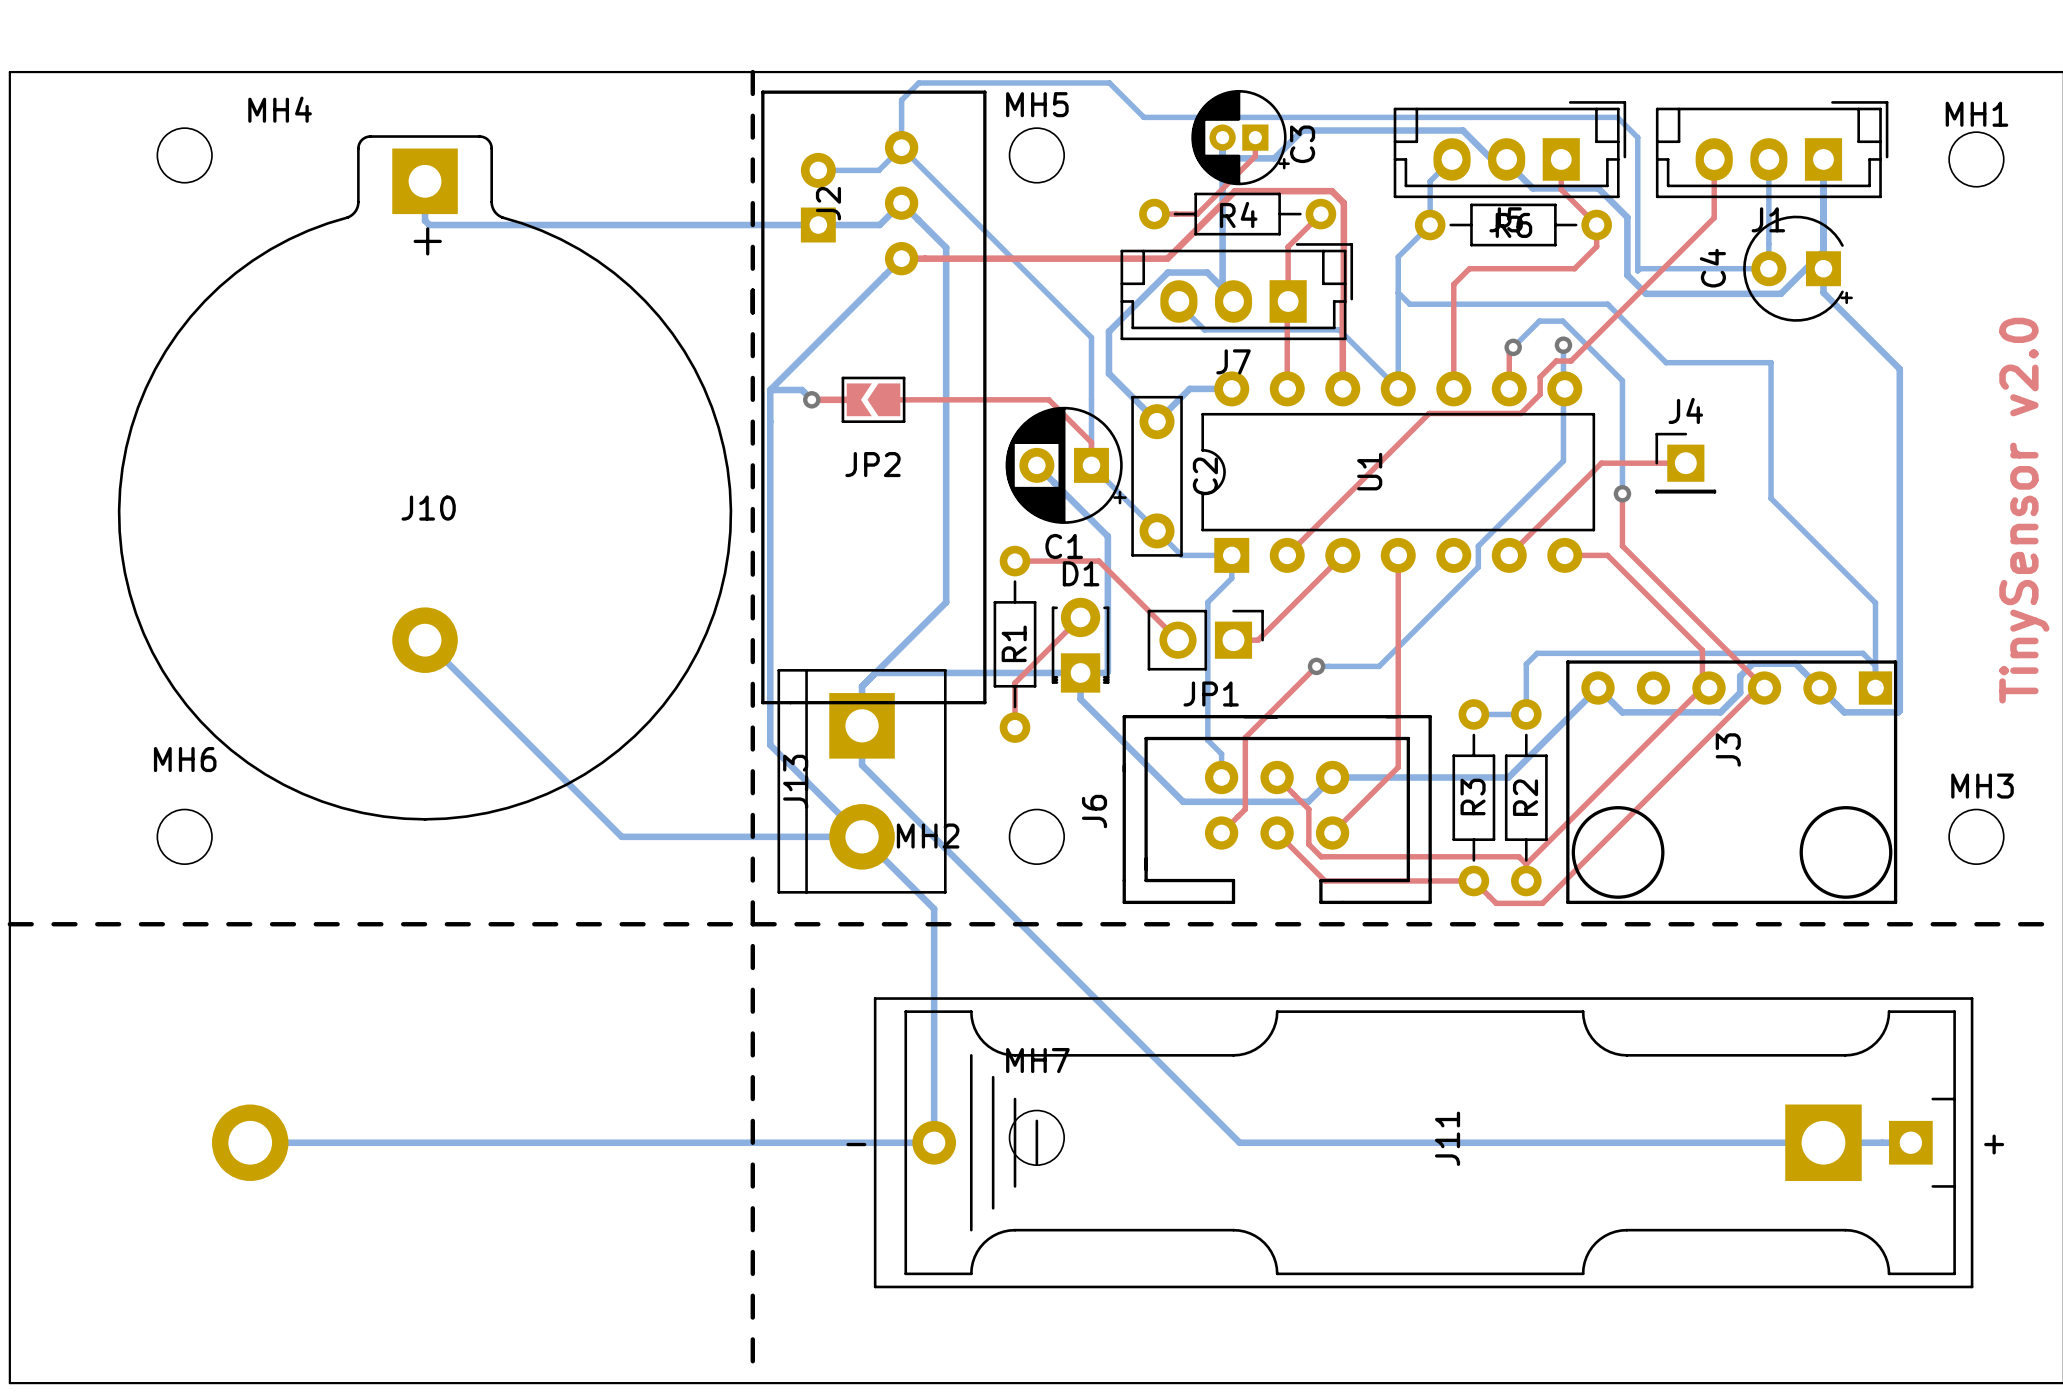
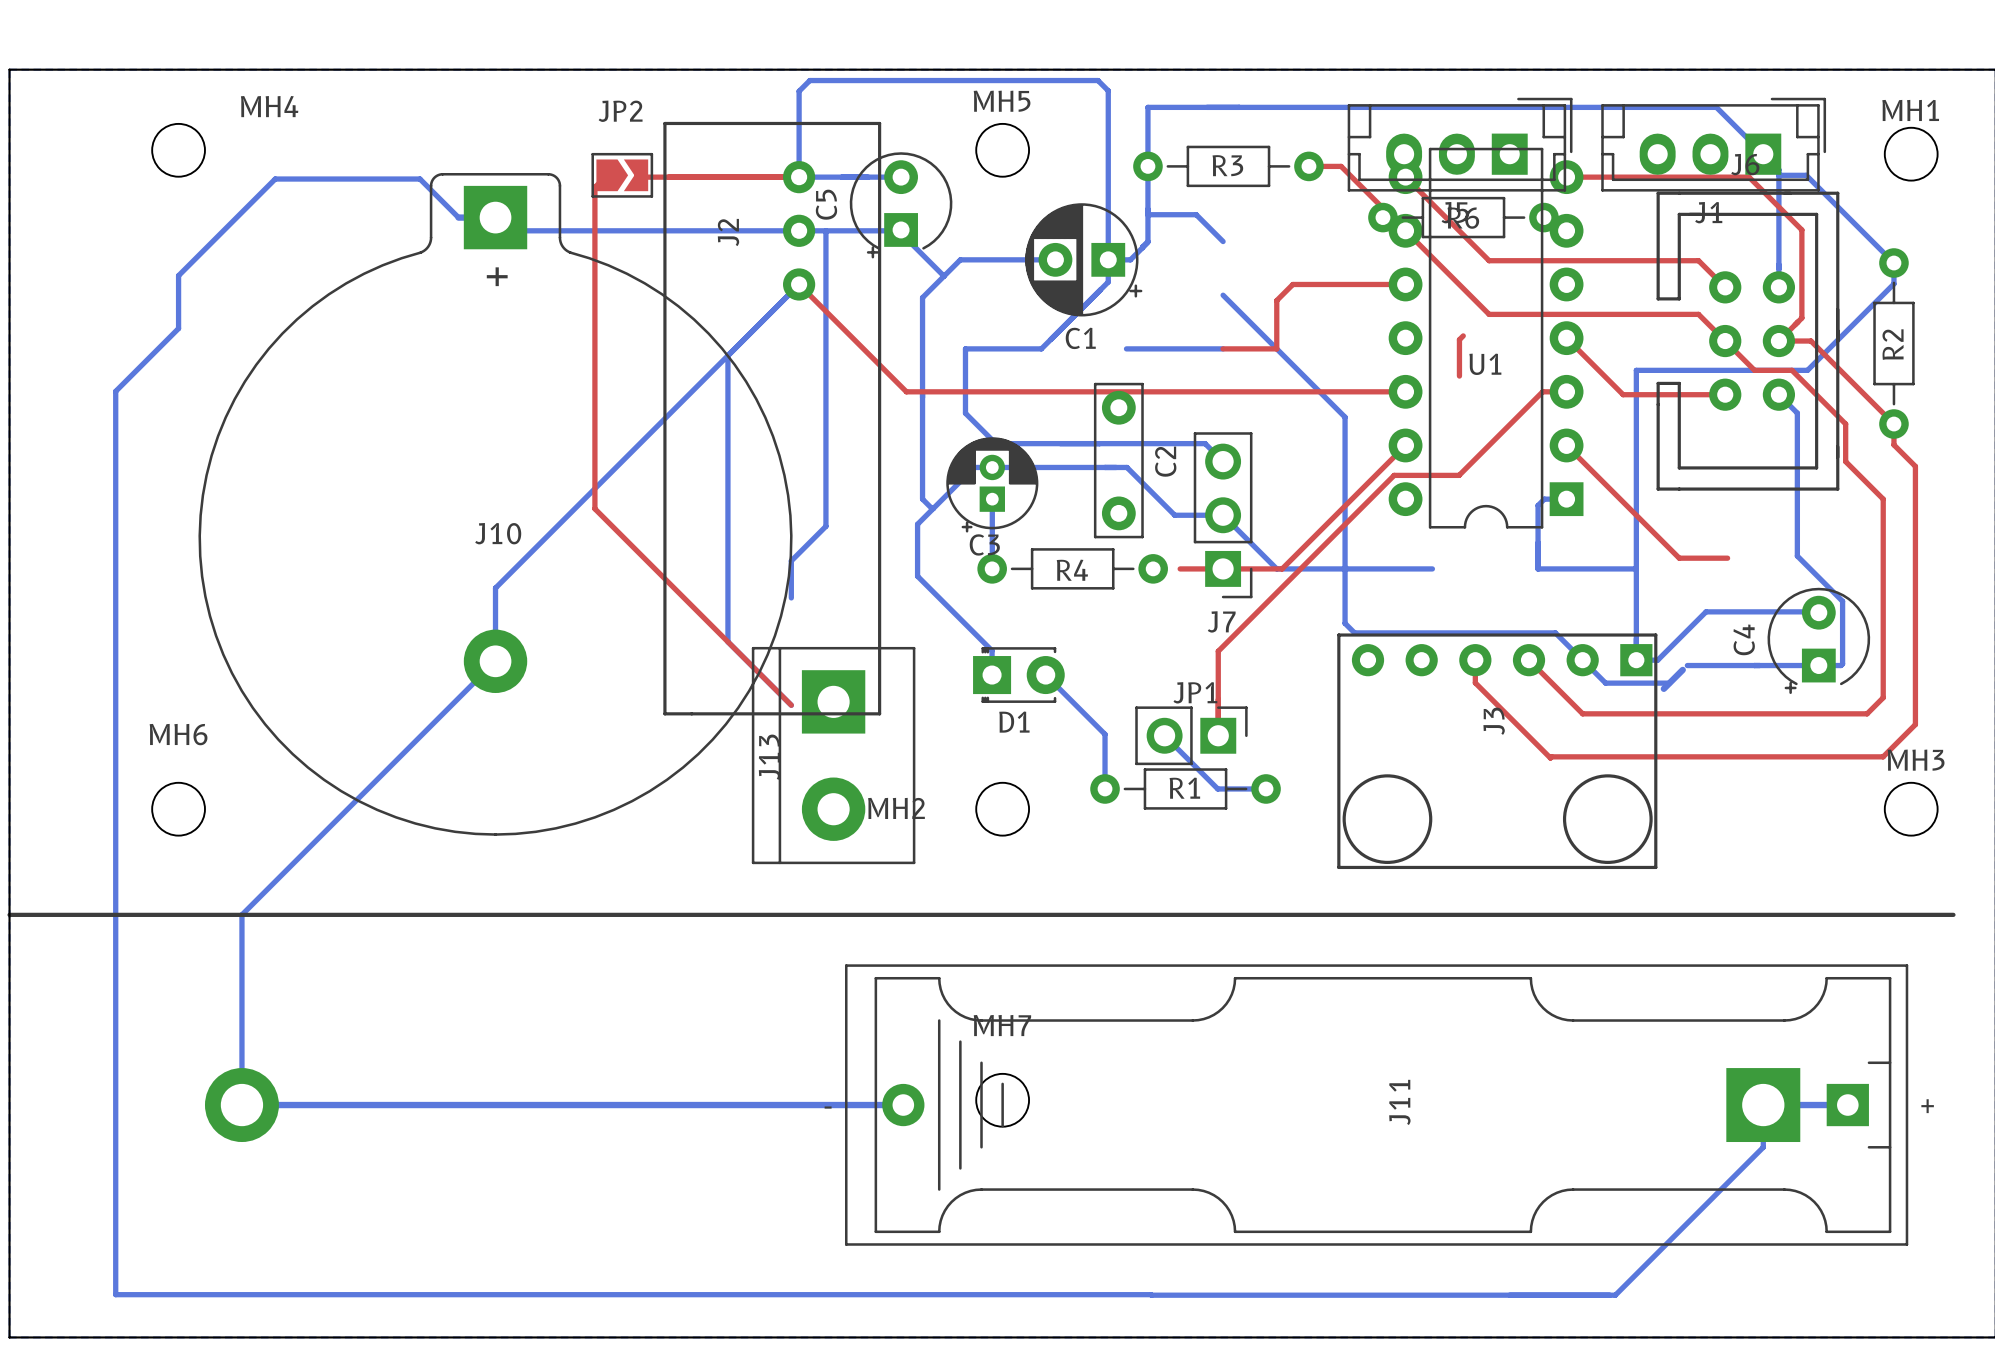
line: (752, 72) (752, 93) -> none
line: (752, 115) (752, 137) -> none
bottom track: (1222, 137) (1222, 290) (1233, 301) (1233, 298) (1207, 272) (1168, 272) (1108, 331) (1108, 373) (1157, 421) (1189, 388) (1231, 388) -> none
C3 rotation: 0° (1240, 137) -> 90° clockwise (992, 484)
C3 position: (1240, 137) -> (992, 484)
top track: (1255, 137) (1255, 156) (1197, 214) (1154, 214) -> none
bottom track: (901, 147) (1091, 337) (1091, 465) (1181, 555) (1231, 555) (1231, 578) (1207, 602) (1207, 740) (1221, 753) (1221, 777) -> none
bottom track: (901, 147) (878, 170) (818, 170) -> none
bottom track: (901, 147) (901, 100) (918, 82) (1109, 82) (1143, 117) (1617, 117) (1637, 137) (1637, 270) (1639, 268) (1768, 268) (1768, 159) -> none
bottom track: (1222, 156) (1224, 158) (1274, 158) (1302, 130) (1462, 130) (1506, 174) (1506, 159) -> none
line: (752, 159) (752, 181) -> none
bottom track: (1452, 159) (1430, 181) (1430, 225) (1398, 256) (1398, 388) (1339, 329) (1204, 329) (1178, 304) (1178, 301) -> none
top track: (1561, 159) (1561, 189) (1596, 225) (1596, 246) (1574, 268) (1469, 268) (1453, 284) (1453, 388) -> none
top track: (1714, 159) (1714, 217) (1571, 361) (1556, 361) (1540, 377) (1540, 394) (1521, 413) (1429, 413) (1287, 555) -> none
bottom track: (1823, 159) (1823, 292) (1899, 369) (1899, 710) (1844, 712) (1795, 663) (1752, 663) (1740, 676) (1740, 692) -> none
bottom track: (1506, 162) (1532, 188) (1598, 188) (1627, 217) (1627, 275) (1646, 293) (1780, 293) (1823, 251) -> none
top track: none -> (1308, 166) (1341, 166) (1489, 314) (1698, 314) (1754, 370) (1791, 370) (1845, 424) (1845, 461) (1883, 499) (1883, 697) (1867, 713) (1582, 713) (1529, 660)
bottom track: (425, 181) (425, 220) (429, 225) (474, 225) -> none
top track: none -> (606, 175) (594, 187) (594, 508) (791, 705)
top track: none -> (637, 175) (639, 177) (799, 177)
bottom track: none -> (1778, 175) (1806, 175) (1893, 263) (1893, 283) (1807, 370) (1636, 370) (1636, 660) (1657, 660) (1706, 611) (1817, 611)
bottom track: none -> (901, 177) (799, 177) (799, 91) (809, 80) (1098, 80) (1108, 90) (1108, 282) (1041, 348) (965, 348) (965, 413) (995, 443) (1205, 443) (1223, 461)
top track: none -> (1405, 177) (1489, 260) (1698, 260) (1725, 287)
top track: none -> (1566, 177) (1749, 177) (1801, 229) (1801, 318) (1778, 341) (1810, 341) (1893, 424) (1893, 444) (1915, 466) (1915, 724) (1883, 756) (1550, 758) (1475, 682) (1475, 660)
C5 side: bottom (818, 197) -> top (901, 205)
line: (752, 203) (752, 225) -> none
R4 position: (1237, 214) -> (1072, 568)
top track: (1320, 214) (1288, 246) (1287, 388) -> none
bottom track: none -> (1147, 214) (1196, 214) (1223, 241)
bottom track: (512, 225) (879, 225) (901, 203) (946, 247) (946, 602) (862, 686) (862, 765) (1239, 1142) (1823, 1142) -> (458, 217) (419, 179) (275, 179) (178, 275) (178, 328) (115, 391) (115, 1294) (1615, 1295) (1763, 1147) (1763, 1105)
bottom track: none -> (495, 217) (508, 230) (898, 230) (944, 276)
bottom track: none -> (825, 230) (825, 526) (791, 560) (791, 597)
J7 footprint: [1120, 243, 1354, 341] -> [1193, 432, 1253, 599]
line: (752, 246) (752, 268) -> none
bottom track: none -> (1147, 242) (1130, 259) (1108, 259)
bottom track: none -> (1142, 247) (1147, 241) (1147, 107) (1716, 107) (1778, 169) (1778, 287)
top track: (901, 258) (1167, 258) (1235, 191) (1331, 191) (1343, 203) (1342, 388) -> none
bottom track: (901, 258) (770, 389) -> none
bottom track: none -> (1055, 259) (960, 259) (922, 297) (922, 499) (933, 508)
C4 rotation: 0° (1798, 268) -> 90° clockwise (1818, 640)
C4 position: (1798, 268) -> (1818, 640)
line: (752, 290) (752, 312) -> none
bottom track: (1398, 292) (1409, 304) (1607, 304) (1666, 362) (1771, 362) (1771, 498) (1875, 602) (1875, 688) -> none
top track: none -> (799, 284) (906, 391) (1405, 391)
bottom track: none -> (799, 284) (495, 588) (495, 661) (241, 914) (241, 1105)
top track: none -> (1405, 284) (1292, 284) (1276, 300) (1276, 348) (1223, 348)
bottom track: none -> (1223, 295) (1345, 417) (1345, 623) (1354, 632) (1555, 632) (1605, 683) (1669, 683)
line: (752, 334) (752, 356) -> none
bottom track: (1563, 345) (1563, 461) (1478, 546) (1478, 567) (1379, 666) (1316, 666) -> none
via: (1563, 345) -> none
bottom track: (1513, 347) (1539, 321) (1562, 321) (1622, 380) (1622, 493) -> none
via: (1513, 347) -> none
top track: none -> (1566, 338) (1623, 394) (1725, 394)
bottom track: none -> (1126, 348) (1223, 348)
bottom track: none -> (727, 355) (727, 641) (791, 705)
line: (752, 377) (752, 399) -> none
bottom track: (770, 389) (770, 745) (934, 908) (934, 1142) -> none
bottom track: (770, 389) (801, 389) (811, 399) -> none
J2 position: (873, 397) -> (772, 418)
top track: (811, 399) (857, 399) -> none
via: (811, 399) -> none
JP2 rotation: 0° (873, 399) -> 180° (622, 175)
JP2 position: (873, 399) -> (622, 175)
top track: (889, 399) (1048, 399) (1091, 442) (1091, 465) -> none
top track: none -> (1566, 391) (1542, 391) (1459, 475) (1394, 475) (1218, 651) (1218, 735)
bottom track: none -> (1778, 394) (1797, 413) (1797, 556) (1842, 601) (1842, 663) (1841, 665) (1687, 665)
line: (752, 421) (752, 443) -> none
top track: none -> (1405, 445) (1282, 568) (1180, 568)
top track: none -> (1566, 445) (1679, 558) (1727, 558)
top track: (1685, 463) (1601, 463) (1509, 555) -> none
J4: (1685, 463) -> none
line: (752, 465) (752, 487) -> none
bottom track: (1036, 465) (1107, 536) (1107, 671) (875, 672) -> none
C1 position: (1066, 465) -> (1083, 259)
U1 rotation: 0° (1398, 472) -> 90° counterclockwise (1486, 338)
J10 position: (425, 477) -> (495, 504)
top track: (1622, 493) (1622, 546) (1764, 688) -> none
via: (1622, 493) -> none
line: (752, 509) (752, 530) -> none
text: TinySensor v2.0 (2024, 510) -> none
bottom track: none -> (992, 499) (992, 568)
bottom track: none -> (1566, 499) (1544, 499) (1538, 505) (1538, 568) (1636, 568)
line: (752, 552) (752, 574) -> none
top track: (1342, 555) (1257, 640) (1233, 640) -> none
top track: (1398, 555) (1398, 767) (1332, 833) -> none
top track: (1564, 555) (1607, 555) (1702, 650) (1702, 688) (1526, 864) -> none
top track: (1015, 561) (1098, 561) (1178, 640) -> none
D1 name position: D1 (1081, 573) -> D1 (1014, 722)
bottom track: none -> (1432, 568) (1276, 568) (1223, 515) (1174, 515) (1127, 467) (974, 467) (917, 524) (917, 576) (992, 650) (992, 675)
line: (752, 596) (752, 618) -> none
top track: (1080, 617) (1015, 683) (1015, 727) -> none
bottom track: (425, 640) (621, 836) (862, 836) -> none
line: (752, 640) (752, 662) -> none
JP1 position: (1205, 640) -> (1191, 735)
R1 rotation: 0° (1015, 644) -> 90° clockwise (1185, 788)
R1 position: (1015, 644) -> (1185, 788)
D1 rotation: 0° (1080, 645) -> 90° clockwise (1018, 675)
D1 position: (1080, 645) -> (1018, 675)
bottom track: (1875, 665) (1862, 653) (1537, 653) (1526, 664) (1526, 714) (1473, 714) -> none
top track: (1316, 666) (1245, 737) (1245, 809) (1221, 833) -> none
via: (1316, 666) -> none
bottom track: (1080, 672) (1080, 699) (1183, 801) (1308, 801) (1332, 777) (1508, 777) (1597, 688) (1622, 712) (1720, 712) -> none
line: (752, 683) (752, 705) -> none
top track: (1757, 688) (1542, 903) (1496, 903) (1473, 880) (1325, 880) (1277, 833) -> none
JP1 name position: JP1 (1211, 693) -> JP1 (1195, 692)
bottom track: none -> (1045, 675) (1105, 734) (1105, 788)
line: (752, 727) (752, 749) -> none
bottom track: none -> (1164, 735) (1217, 788) (1266, 788)
line: (752, 771) (752, 793) -> none
top track: (1277, 777) (1308, 809) (1308, 844) (1321, 856) (1518, 856) (1526, 864) -> none
J3 position: (1731, 782) -> (1497, 751)
R3 rotation: 0° (1473, 797) -> 90° clockwise (1228, 166)
R3 position: (1473, 797) -> (1228, 166)
R2 position: (1526, 797) -> (1893, 343)
J6 rotation: 0° (1277, 809) -> 90° clockwise (1747, 341)
J6 position: (1277, 809) -> (1747, 341)
line: (752, 814) (752, 836) -> none
line: (752, 858) (752, 880) -> none
line: (752, 902) (752, 924) (774, 924) -> none
line: (9, 924) (31, 924) -> none
line: (53, 924) (75, 924) -> none
line: (97, 924) (119, 924) -> none
line: (140, 924) (162, 924) -> none
line: (184, 924) (206, 924) -> none
line: (228, 924) (250, 924) -> none
line: (272, 924) (293, 924) -> none
line: (315, 924) (337, 924) -> none
line: (359, 924) (381, 924) -> none
line: (403, 924) (425, 924) -> none
line: (446, 924) (468, 924) -> none
line: (490, 924) (512, 924) -> none
line: (534, 924) (556, 924) -> none
line: (577, 924) (599, 924) -> none
line: (621, 924) (643, 924) -> none
line: (665, 924) (687, 924) -> none
line: (709, 924) (730, 924) -> none
line: (796, 924) (818, 924) -> none
line: (840, 924) (862, 924) -> none
line: (883, 924) (905, 924) -> none
line: (927, 924) (949, 924) -> none
line: (971, 924) (993, 924) -> none
line: (1015, 924) (1036, 924) -> none
line: (1058, 924) (1080, 924) -> none
line: (1102, 924) (1124, 924) -> none
line: (1146, 924) (1167, 924) -> none
line: (1189, 924) (1211, 924) -> none
line: (1233, 924) (1255, 924) -> none
line: (1277, 924) (1299, 924) -> none
line: (1320, 924) (1342, 924) -> none
line: (1364, 924) (1386, 924) -> none
line: (1408, 924) (1430, 924) -> none
line: (1452, 924) (1473, 924) -> none
line: (1495, 924) (1517, 924) -> none
line: (1539, 924) (1561, 924) -> none
line: (1583, 924) (1604, 924) -> none
line: (1626, 924) (1648, 924) -> none
line: (1670, 924) (1692, 924) -> none
line: (1714, 924) (1736, 924) -> none
line: (1757, 924) (1779, 924) -> none
line: (1801, 924) (1823, 924) -> none
line: (1845, 924) (1867, 924) -> none
line: (1889, 924) (1910, 924) -> none
line: (1932, 924) (1954, 924) -> none
line: (1976, 924) (1998, 924) -> none
line: (2020, 924) (2041, 924) -> none
line: none -> (9, 914) (1953, 914)
line: (752, 946) (752, 967) -> none
line: (752, 989) (752, 1011) -> none
line: (752, 1033) (752, 1055) -> none
line: (752, 1077) (752, 1099) -> none
line: (752, 1120) (752, 1142) -> none
line: (752, 1164) (752, 1186) -> none
line: (752, 1208) (752, 1230) -> none
line: (752, 1252) (752, 1273) -> none
line: (752, 1295) (752, 1317) -> none
line: (752, 1339) (752, 1361) -> none

